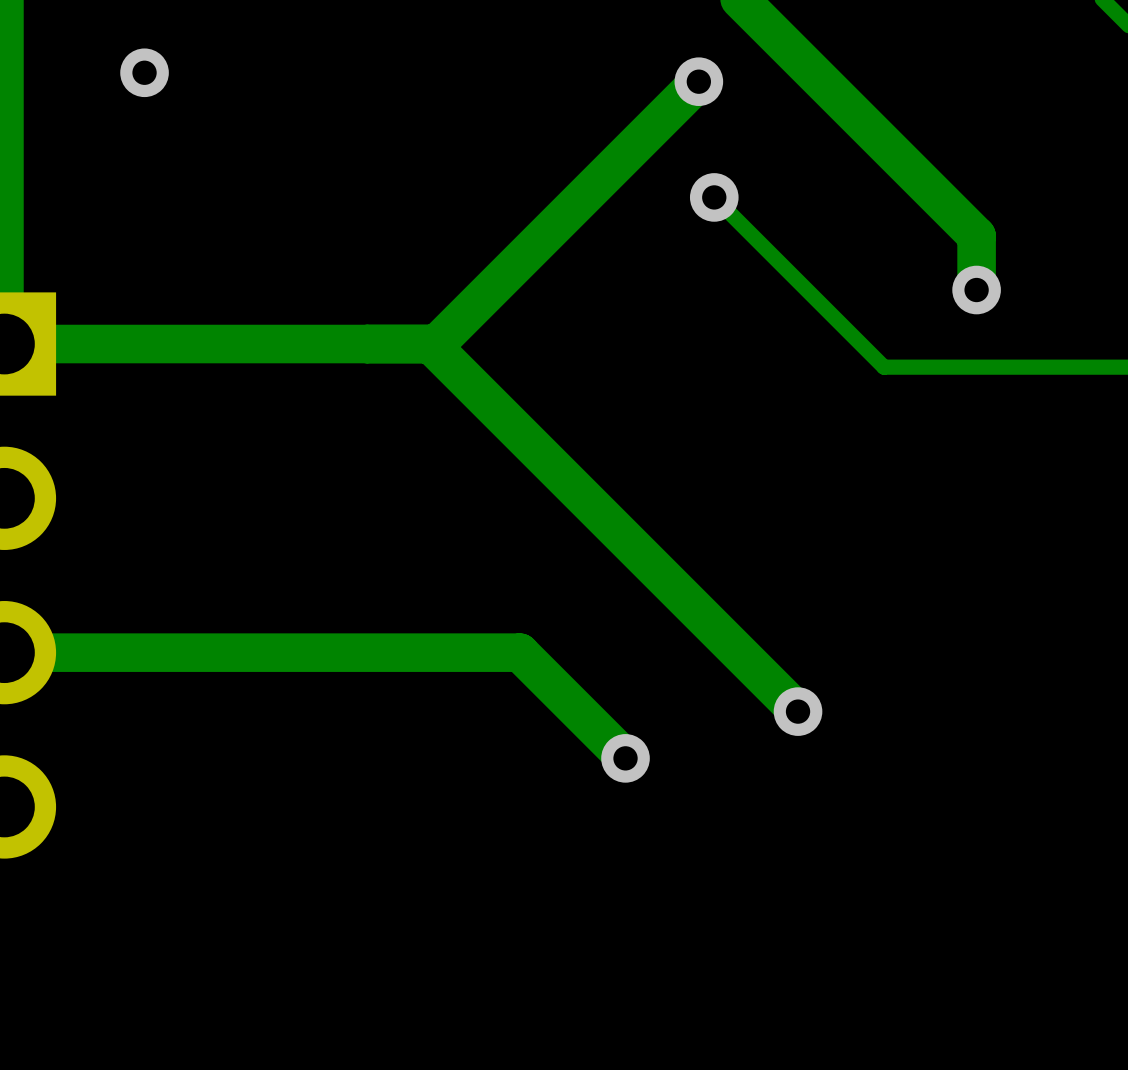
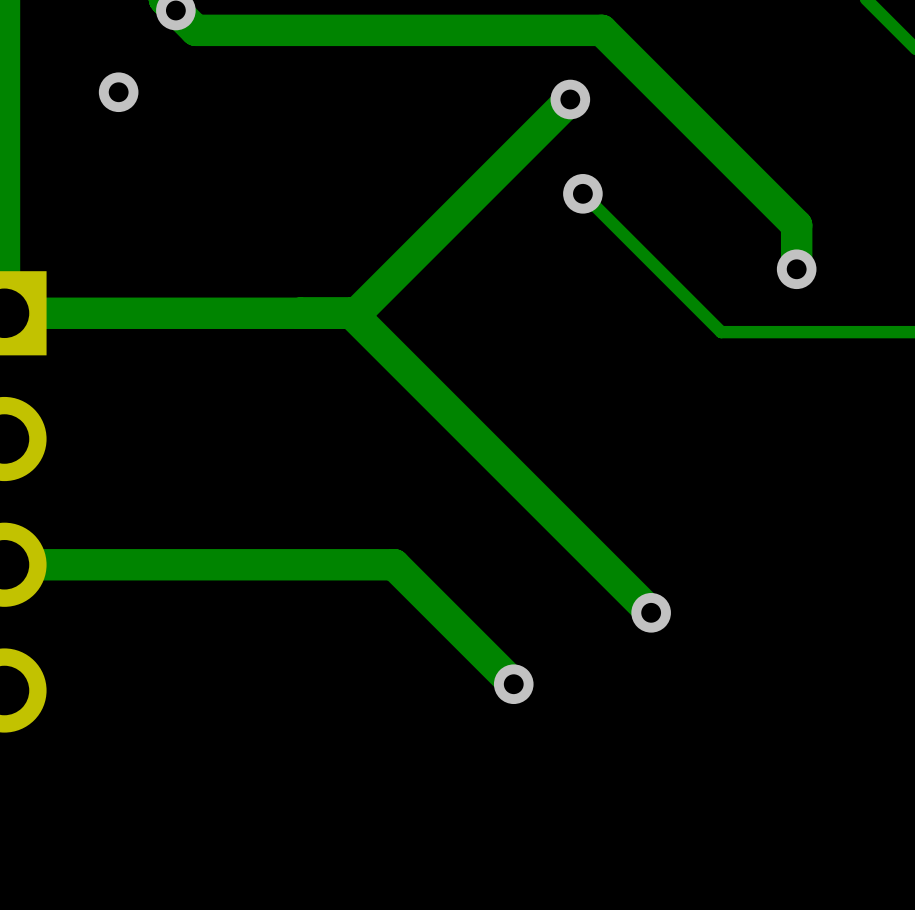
track: (482, 652) (519, 652) (625, 758) -> (394, 564) (513, 684)
via position: (625, 758) -> (513, 684)

